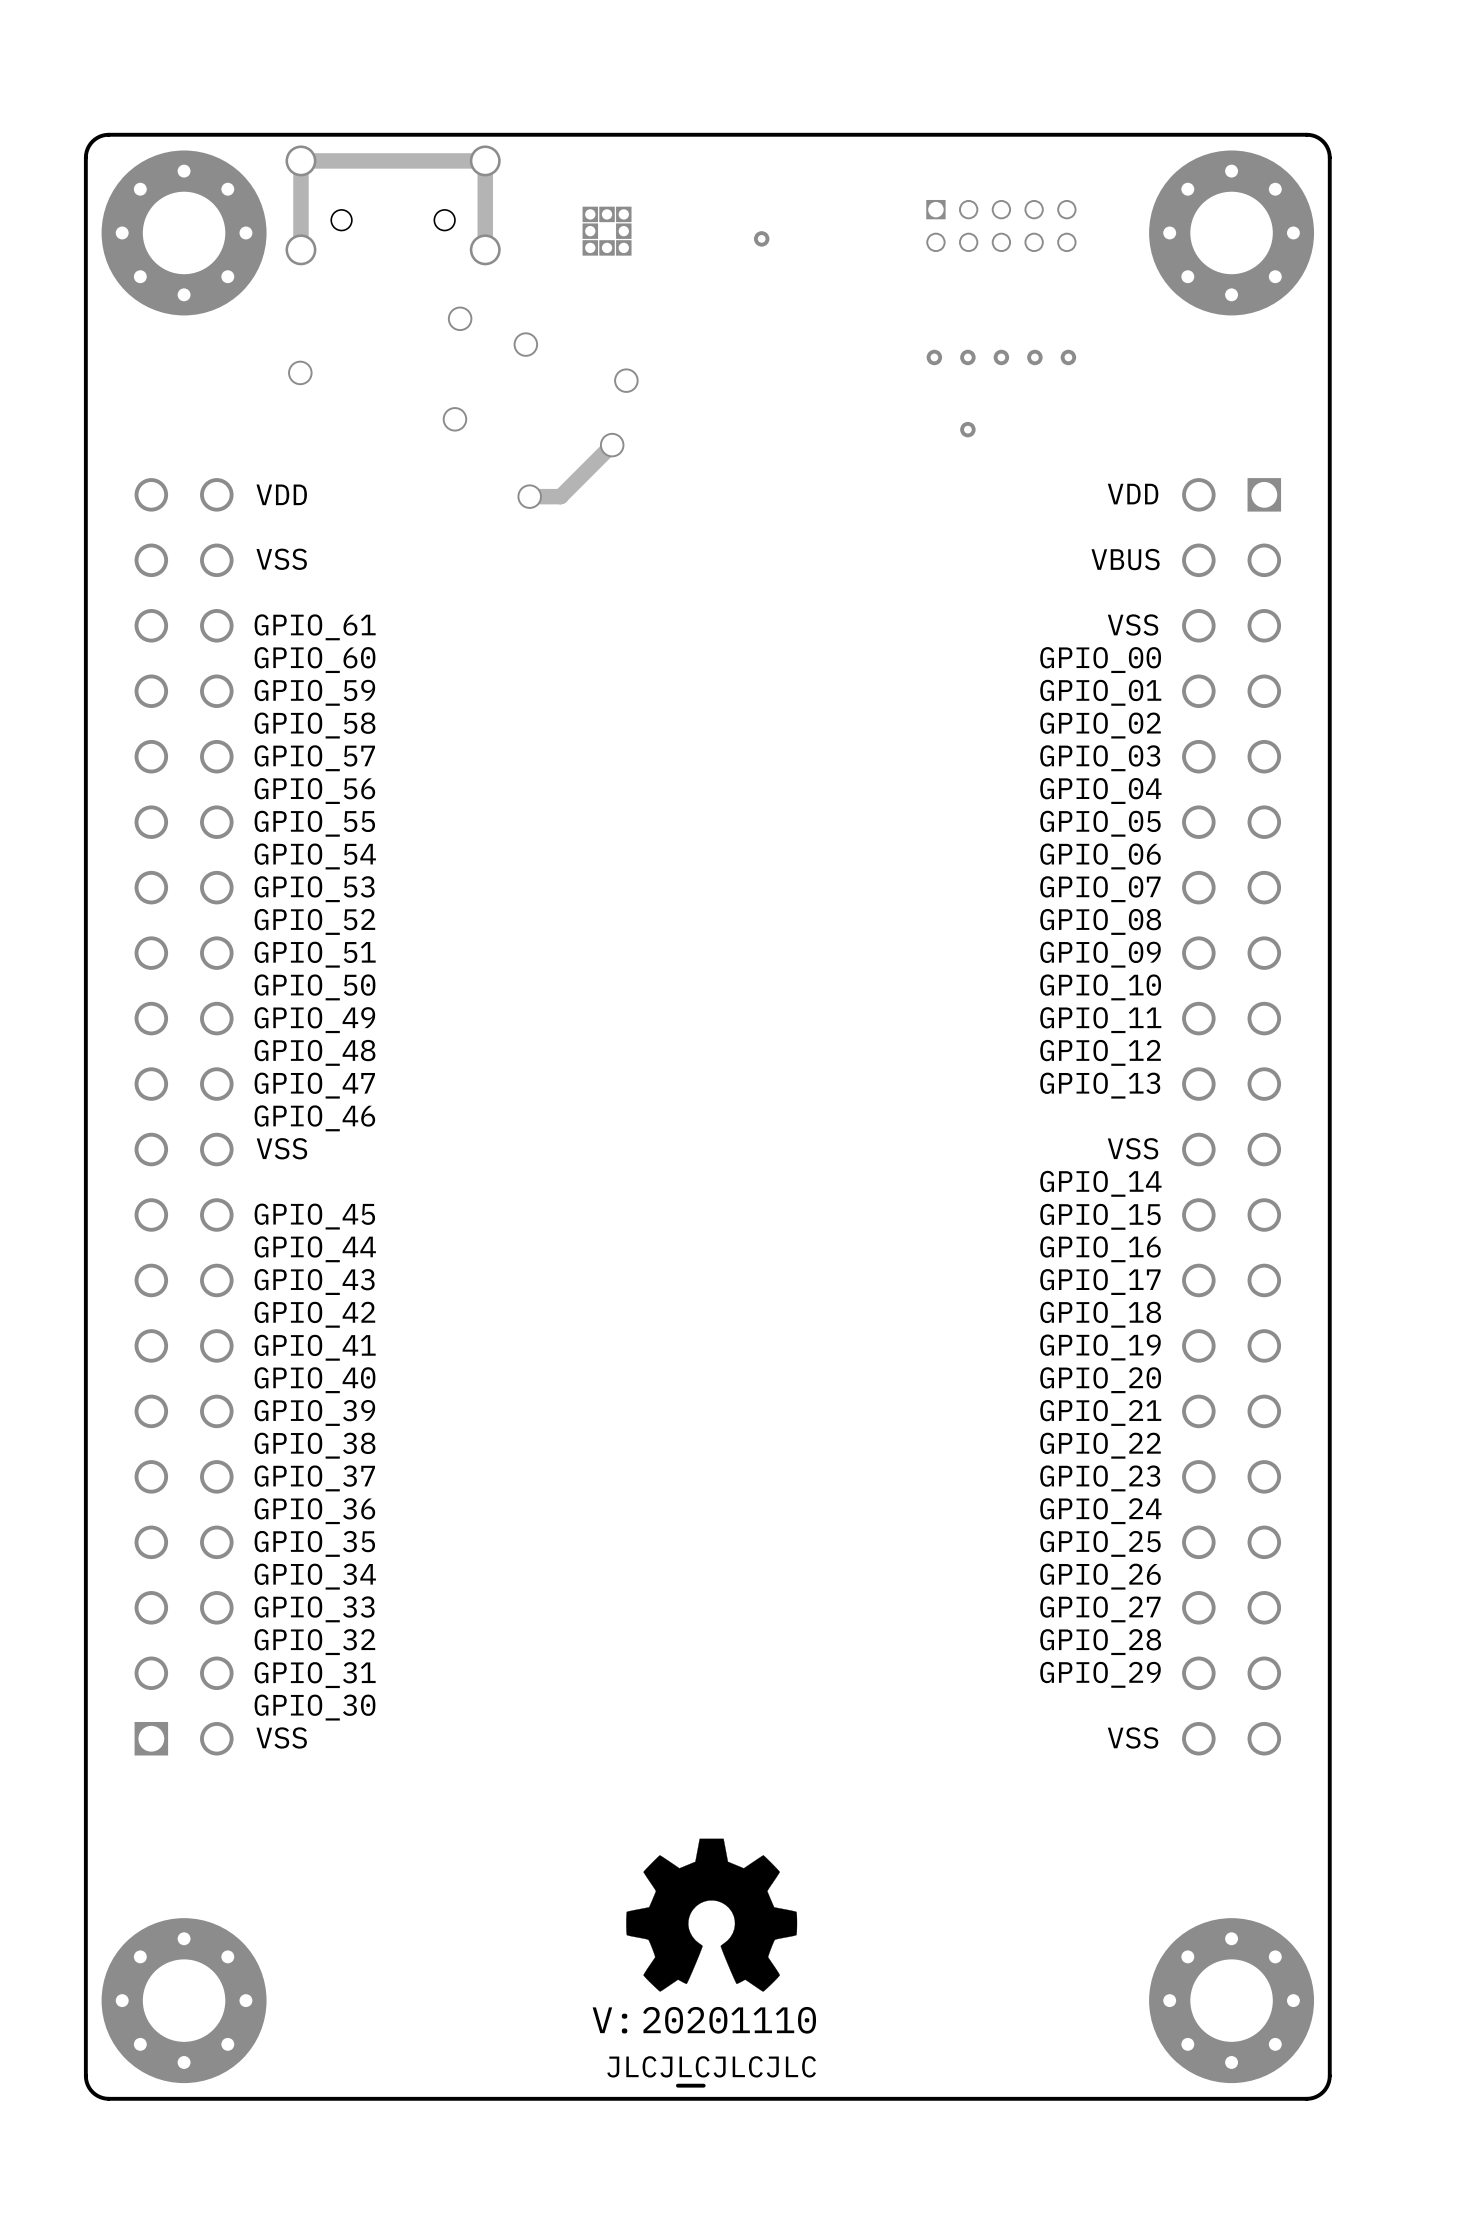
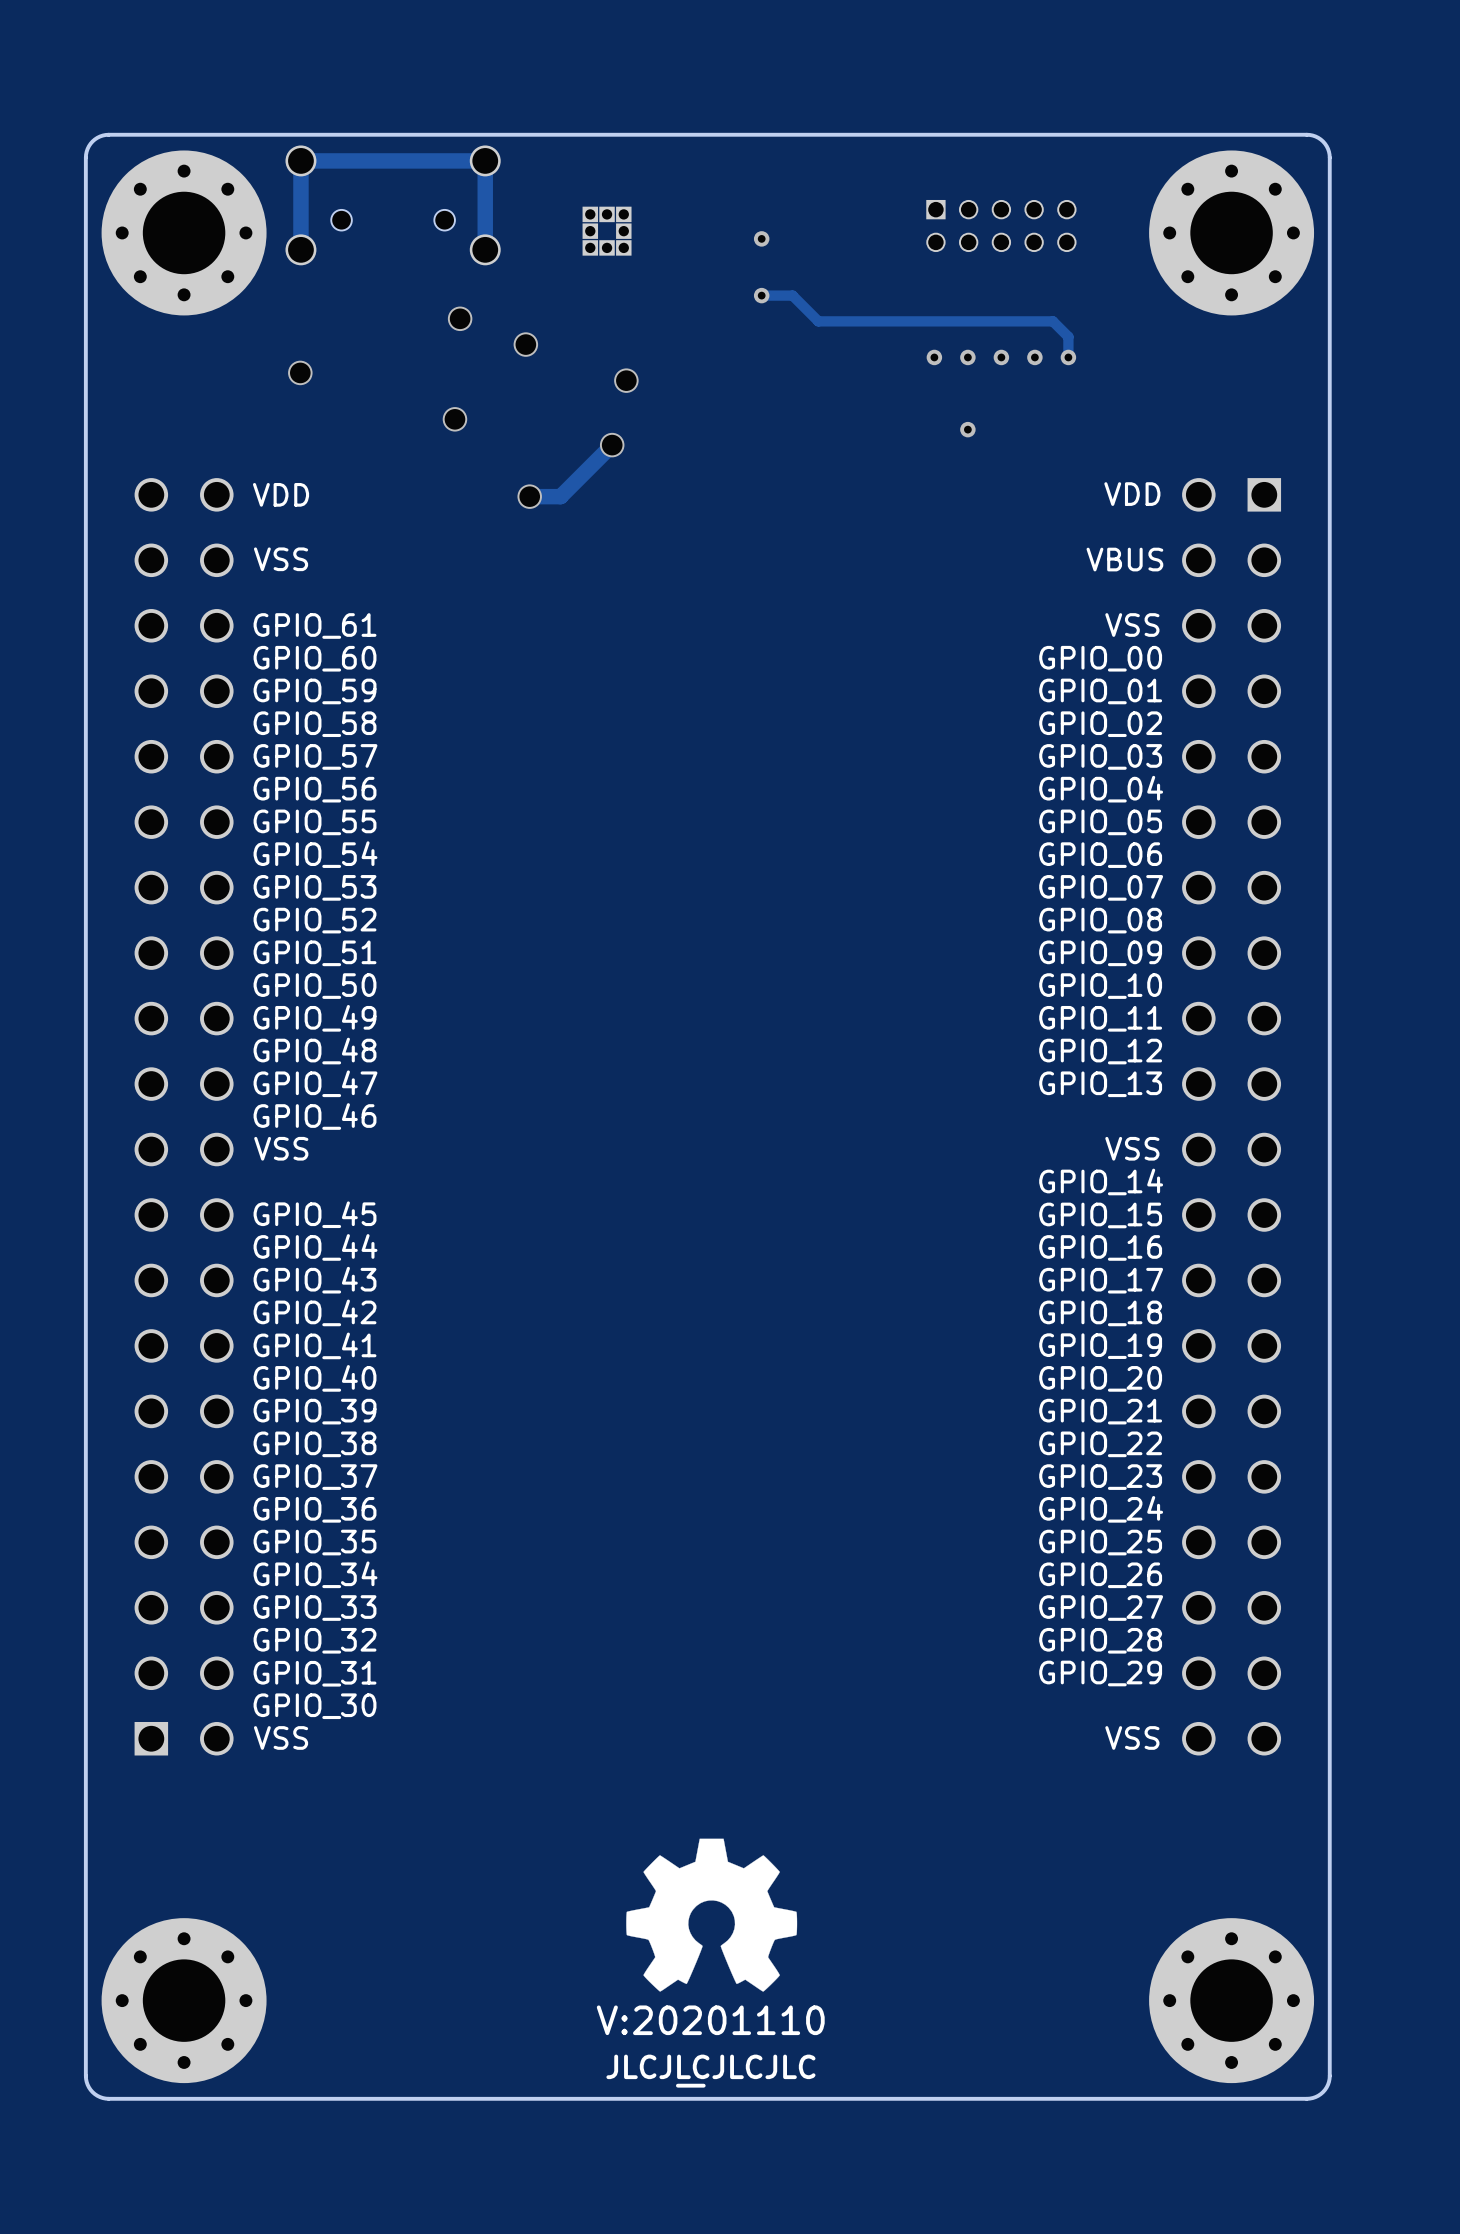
track: none -> (761, 295) (792, 295) (818, 321) (1052, 321) (1068, 336) (1068, 357)
via: none -> (761, 295)

